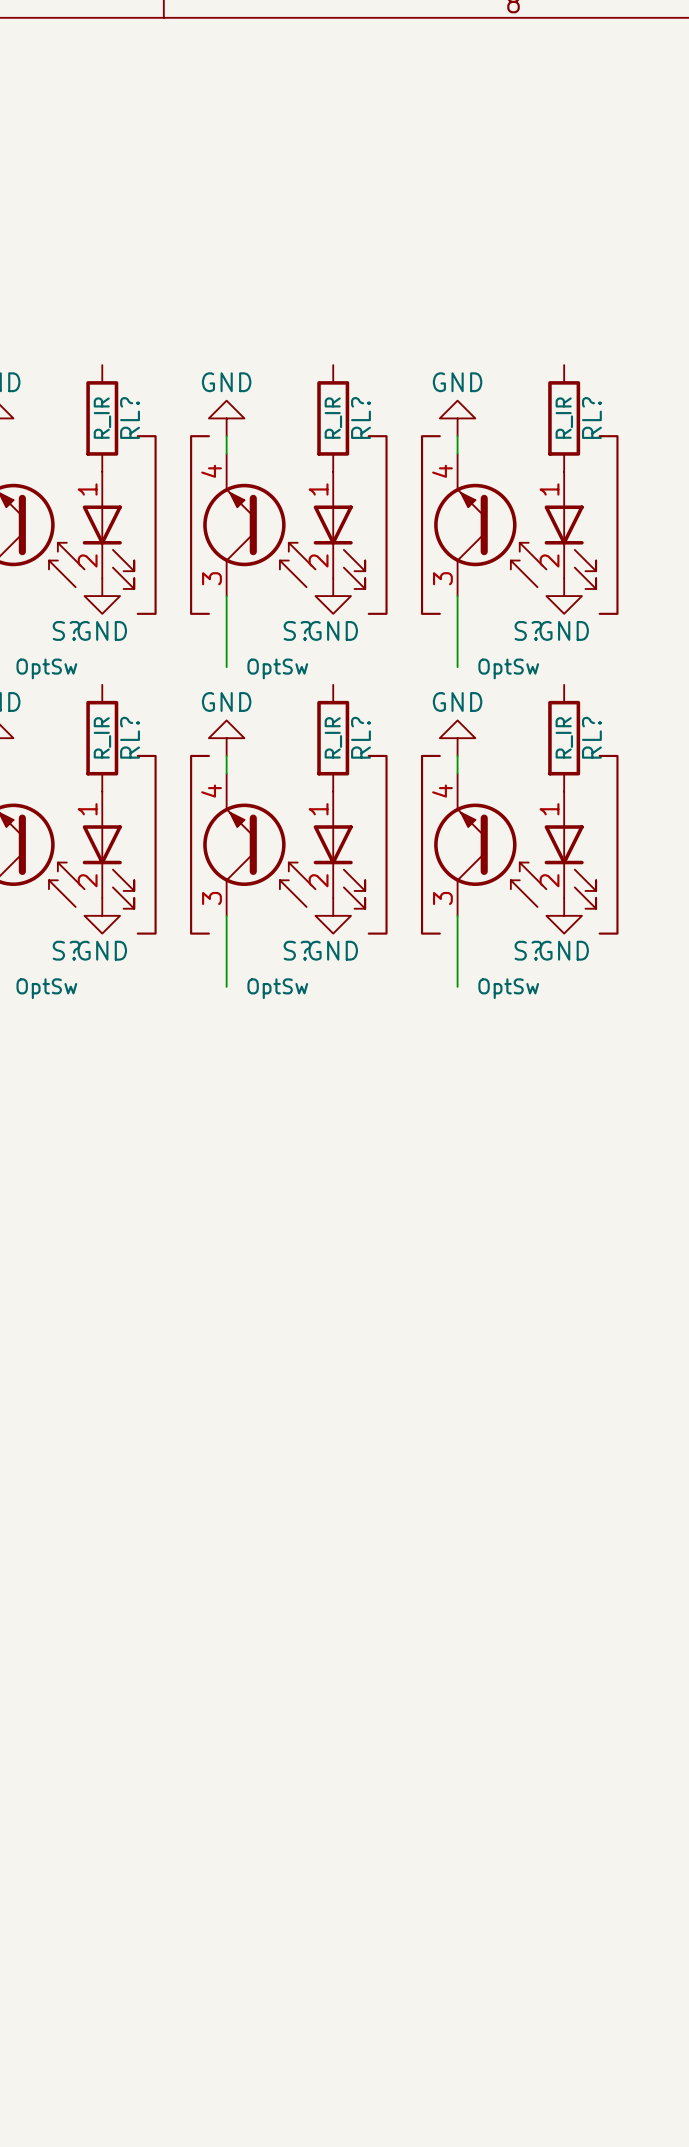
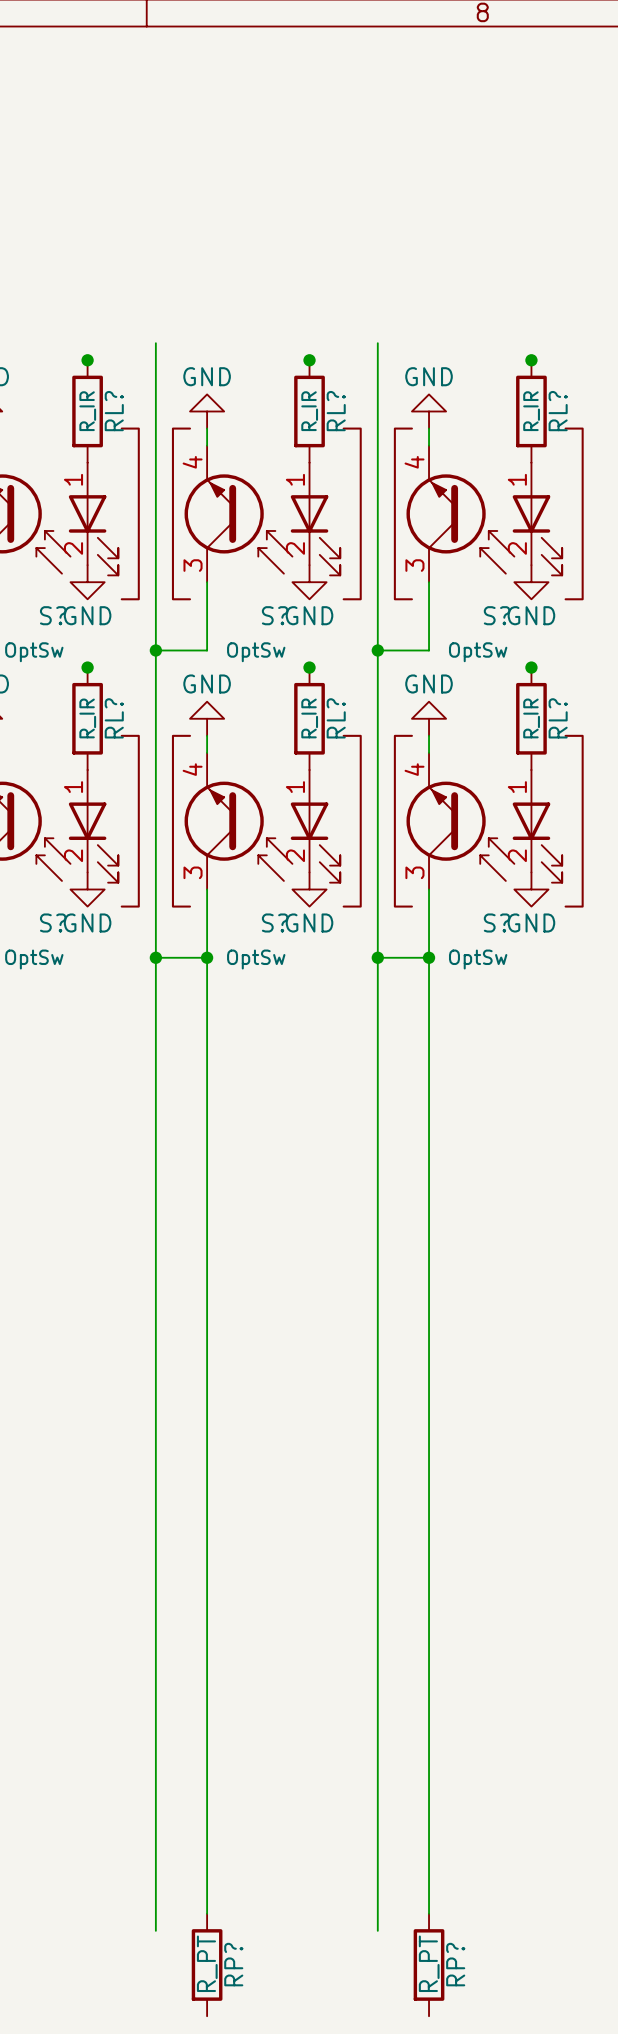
wire: none -> (155, 343) (155, 1930)
wire: none -> (377, 343) (377, 1930)
junction: none -> (87, 360)
junction: none -> (309, 360)
junction: none -> (531, 360)
wire: none -> (155, 650) (207, 650)
junction: none -> (155, 650)
wire: none -> (377, 650) (429, 650)
junction: none -> (377, 650)
junction: none -> (87, 667)
junction: none -> (309, 667)
junction: none -> (531, 667)
wire: none -> (155, 957) (207, 957) (207, 1913)
junction: none -> (155, 957)
junction: none -> (207, 957)
wire: none -> (377, 957) (429, 957) (429, 1913)
junction: none -> (377, 957)
junction: none -> (429, 957)
RP?: none -> R_PT (207, 1964)
RP?: none -> R_PT (429, 1964)

